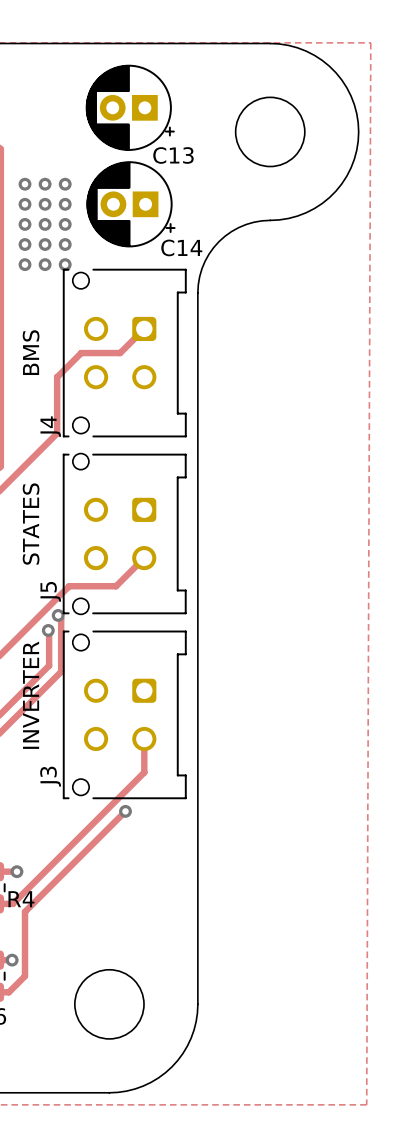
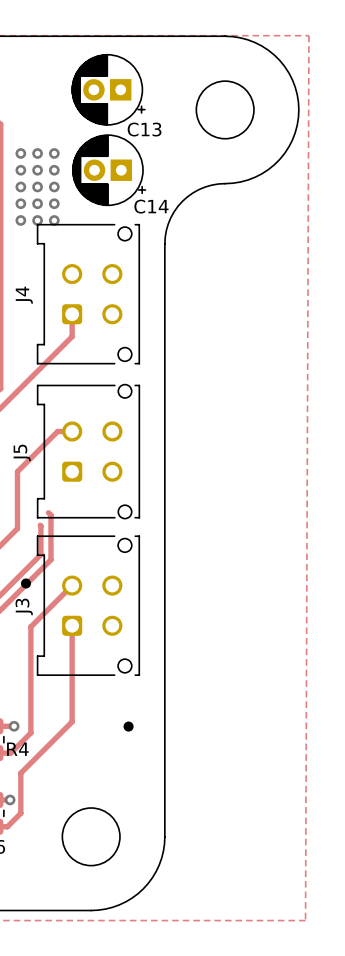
track: (144, 328) (120, 353) (81, 353) (57, 377) (57, 433) -> (72, 314) (72, 336) (47, 361)
text: BMS (31, 352) -> none
J4 rotation: 0° (124, 353) -> 180° (88, 294)
J4 name position: J4 (50, 426) -> J4 (24, 295)
text: STATES (31, 524) -> none
J5 rotation: 0° (124, 533) -> 180° (88, 451)
track: (144, 558) (116, 586) (69, 586) (20, 634) -> (72, 431) (57, 431) (17, 471) (17, 528)
J5 name position: J5 (50, 591) -> J5 (22, 452)
via: (58, 615) -> none
via: (48, 630) -> none
drawing: none -> [20, 578, 32, 589]
text: INVERTER (31, 695) -> none
J3 rotation: 0° (124, 714) -> 180° (88, 605)
track: (144, 739) (144, 772) (37, 879) -> (72, 585) (30, 626) (30, 732)
J3 name position: J3 (50, 776) -> J3 (24, 606)
track: (125, 811) (24, 911) (24, 927) -> (72, 625) (72, 721) (20, 773)
via: (125, 811) -> none
drawing: none -> [123, 721, 134, 732]

